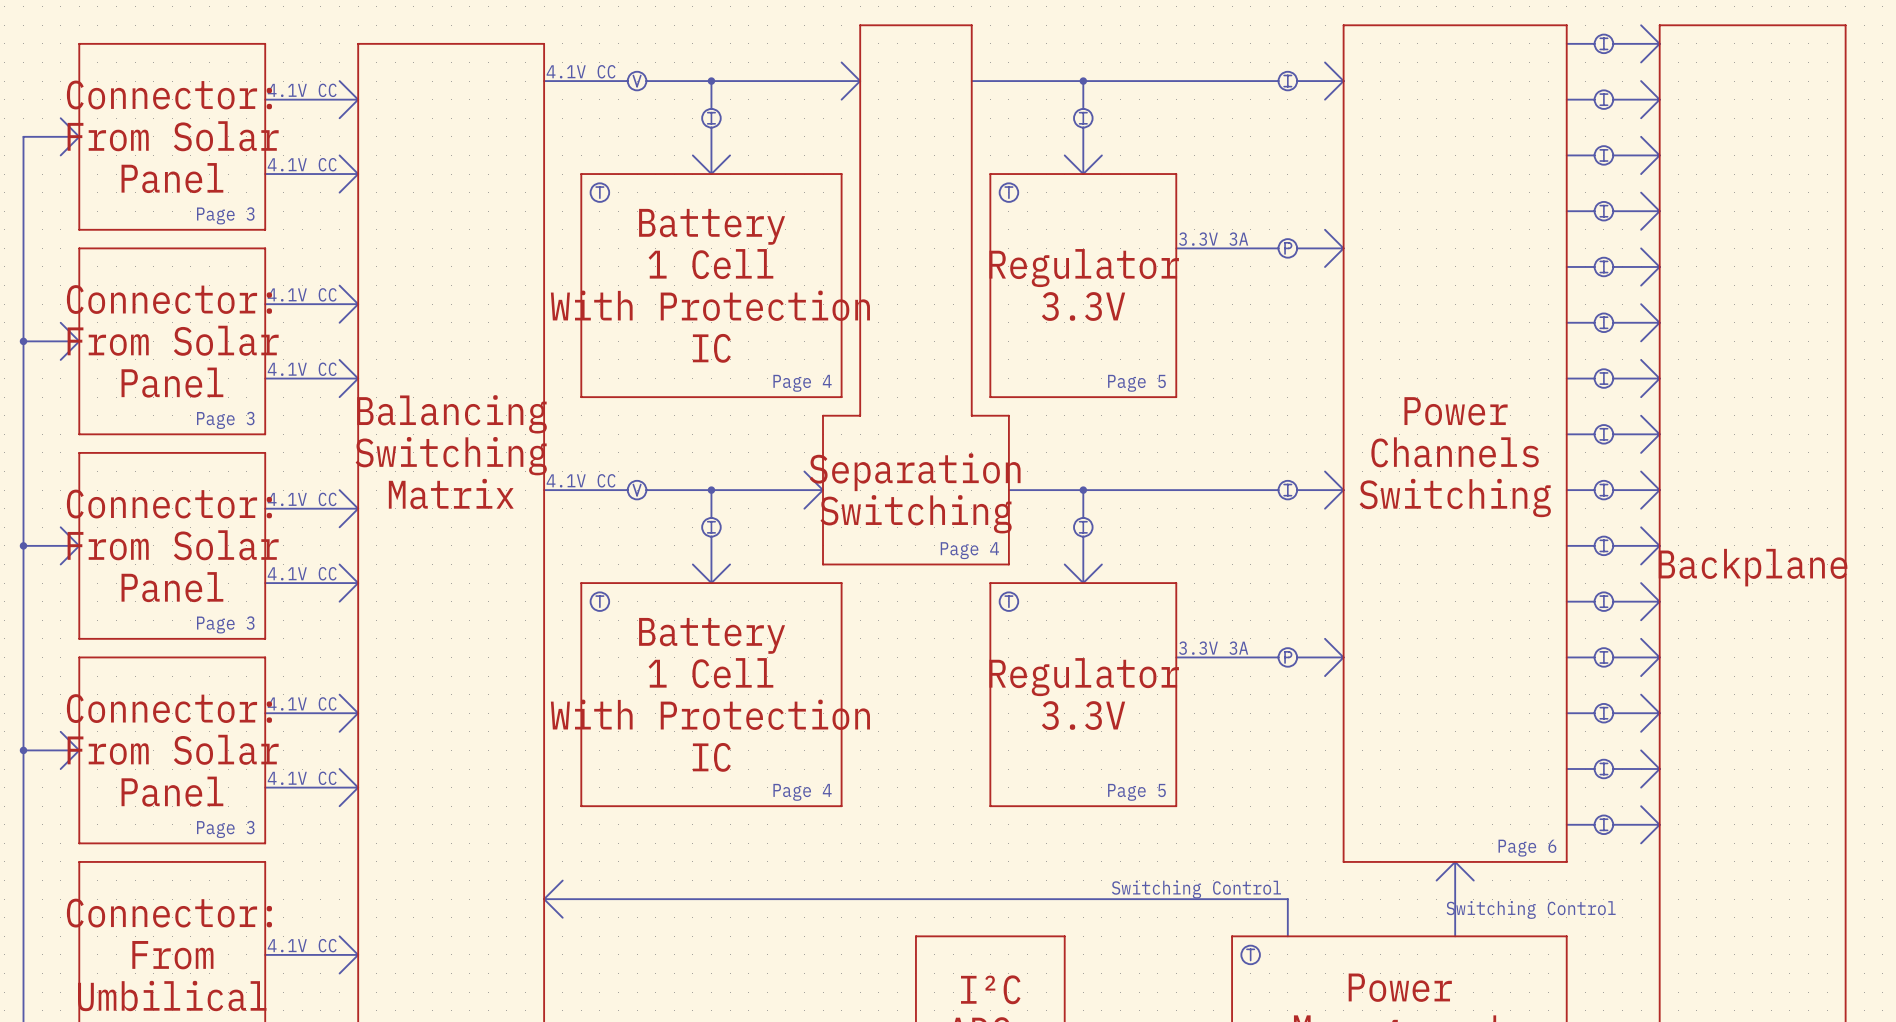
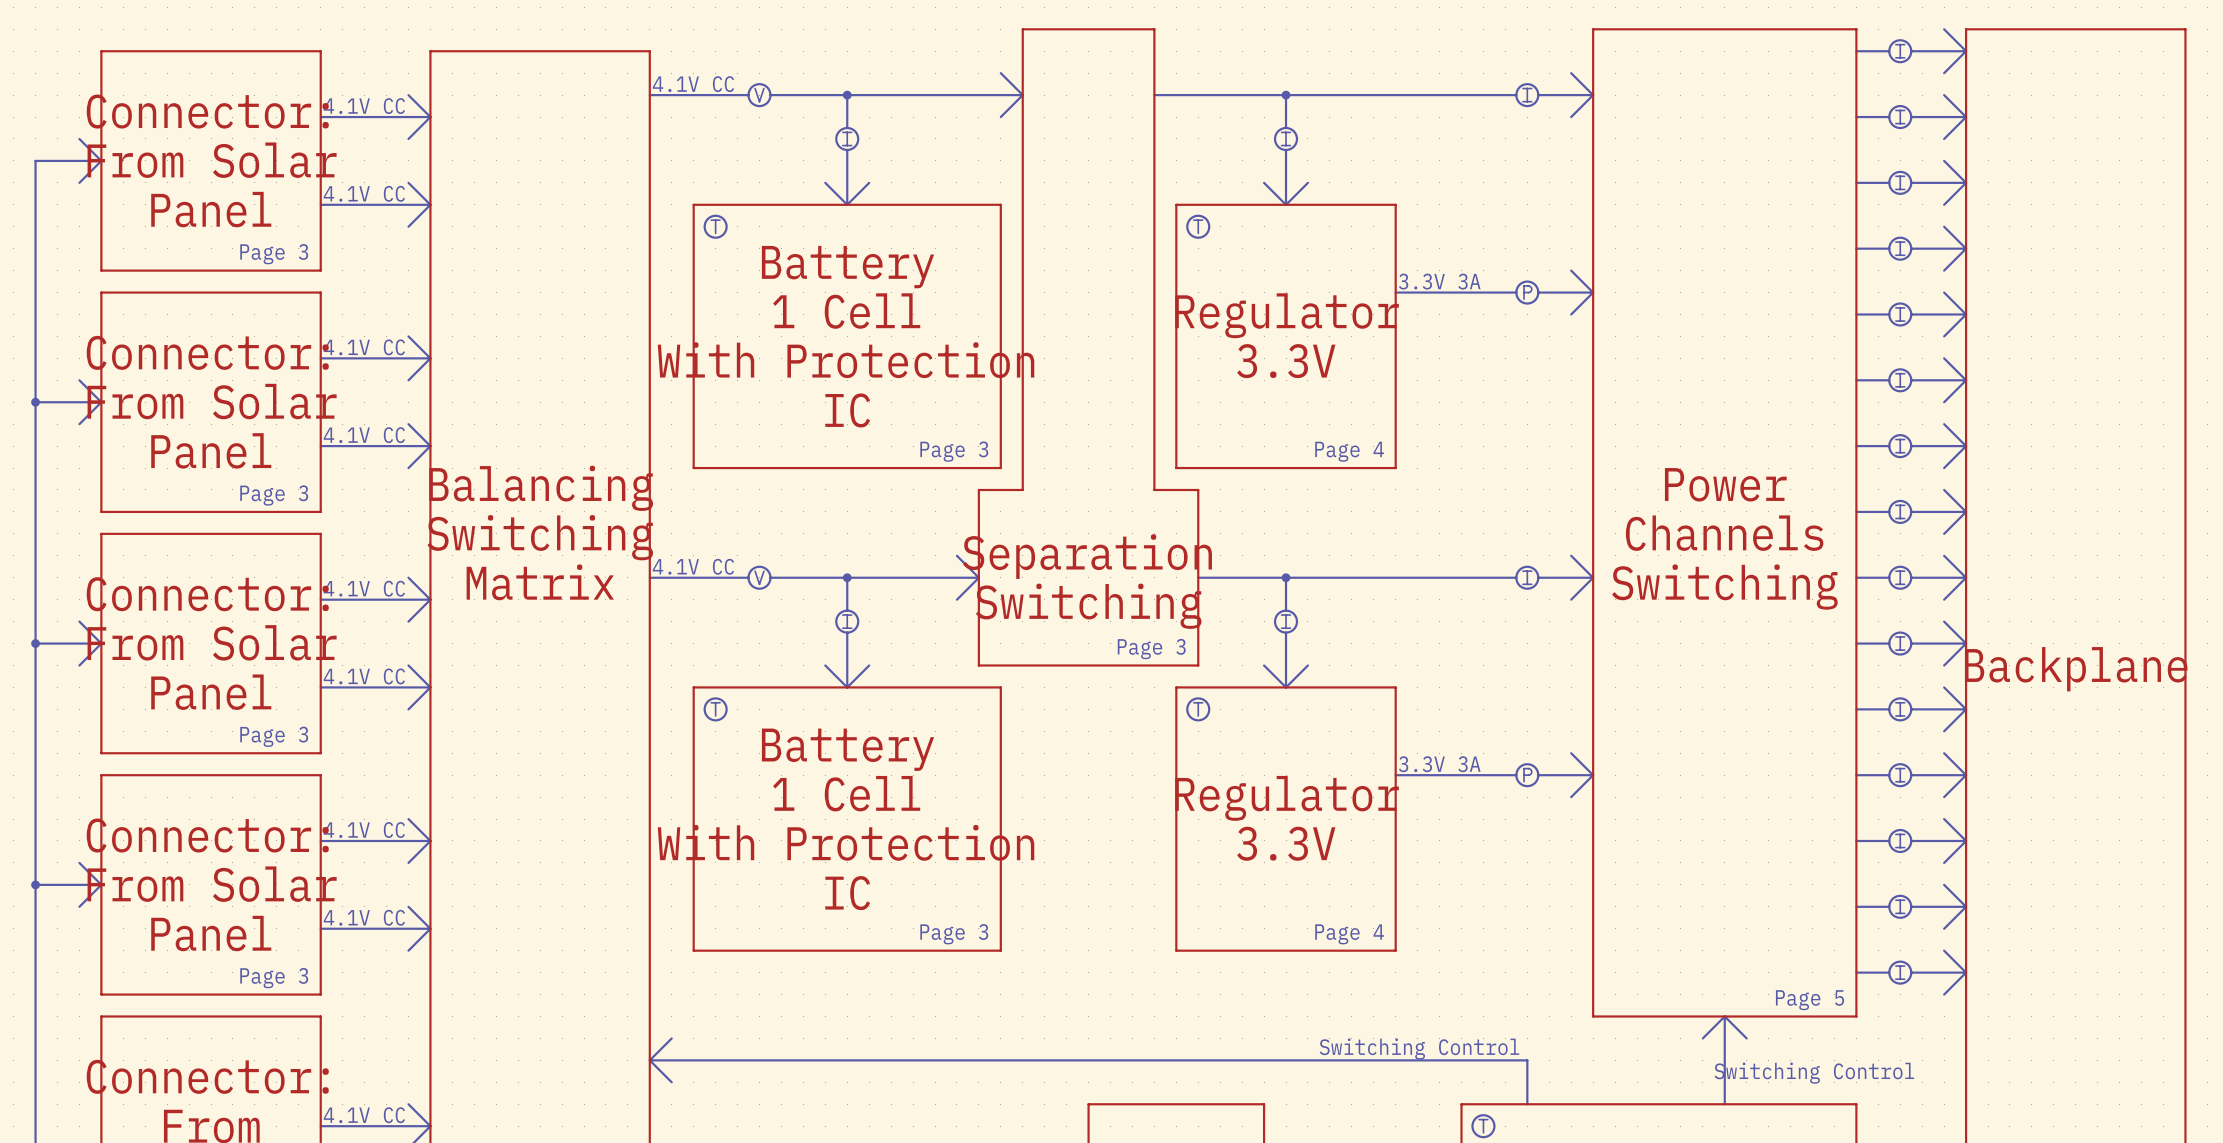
text: Page 4 (802, 383) -> Page 3 (954, 451)
text: Page 5 (1136, 383) -> Page 4 (1349, 451)
text: Page 4 (969, 550) -> Page 3 (1151, 649)
text: Page 4 (802, 792) -> Page 3 (954, 934)
text: Page 5 (1136, 792) -> Page 4 (1349, 934)
text: Page 6 (1527, 848) -> Page 5 (1810, 1000)

